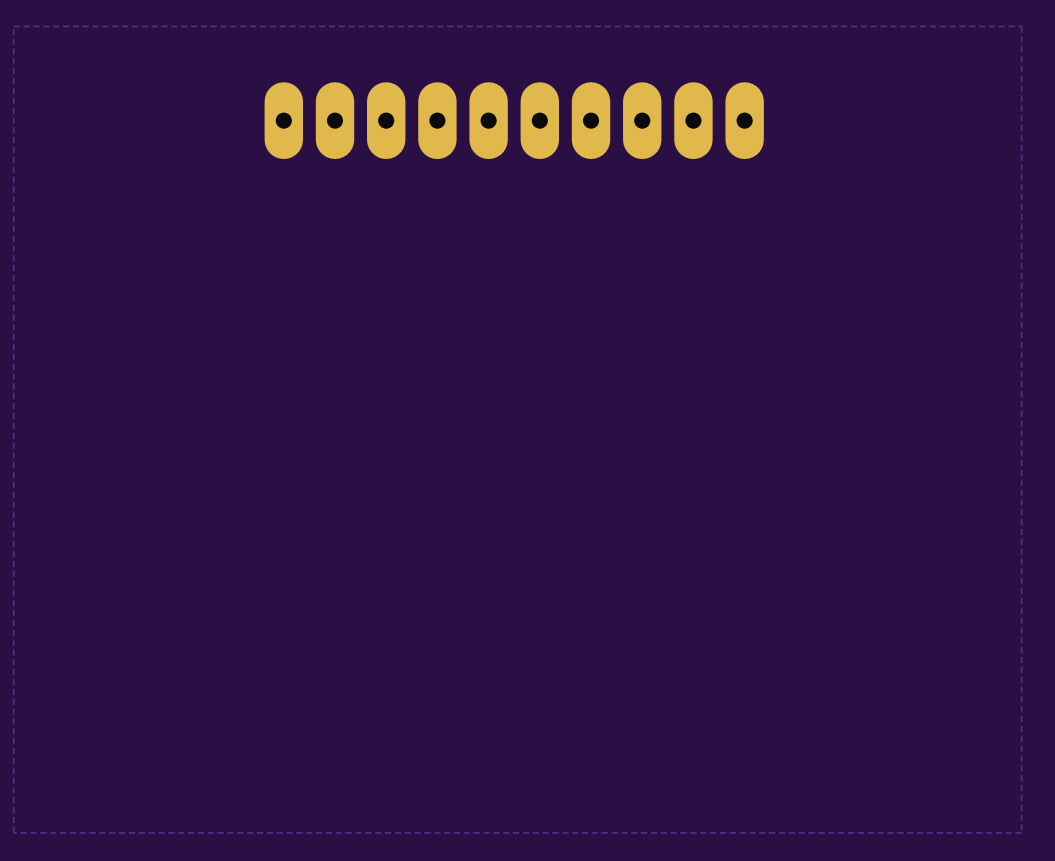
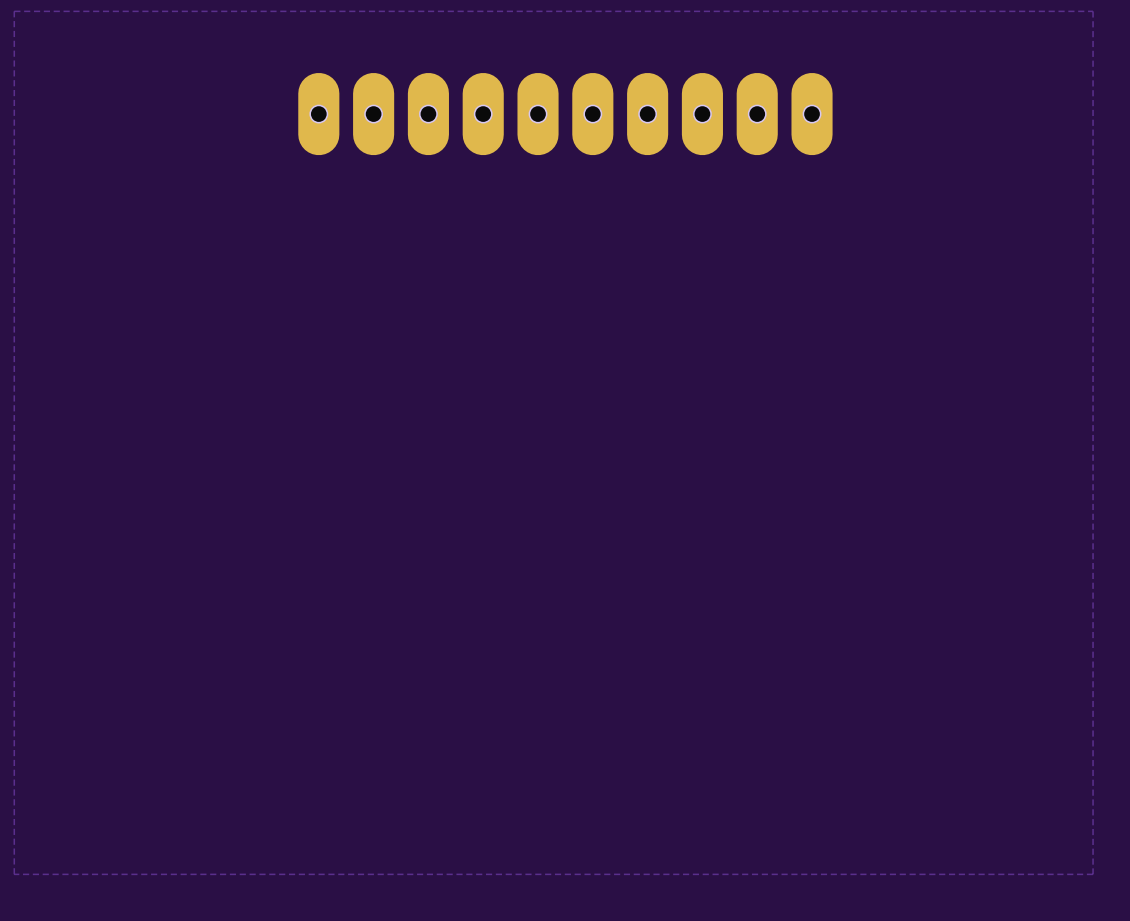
part: (514, 120) -> none
part: none -> (565, 114)

